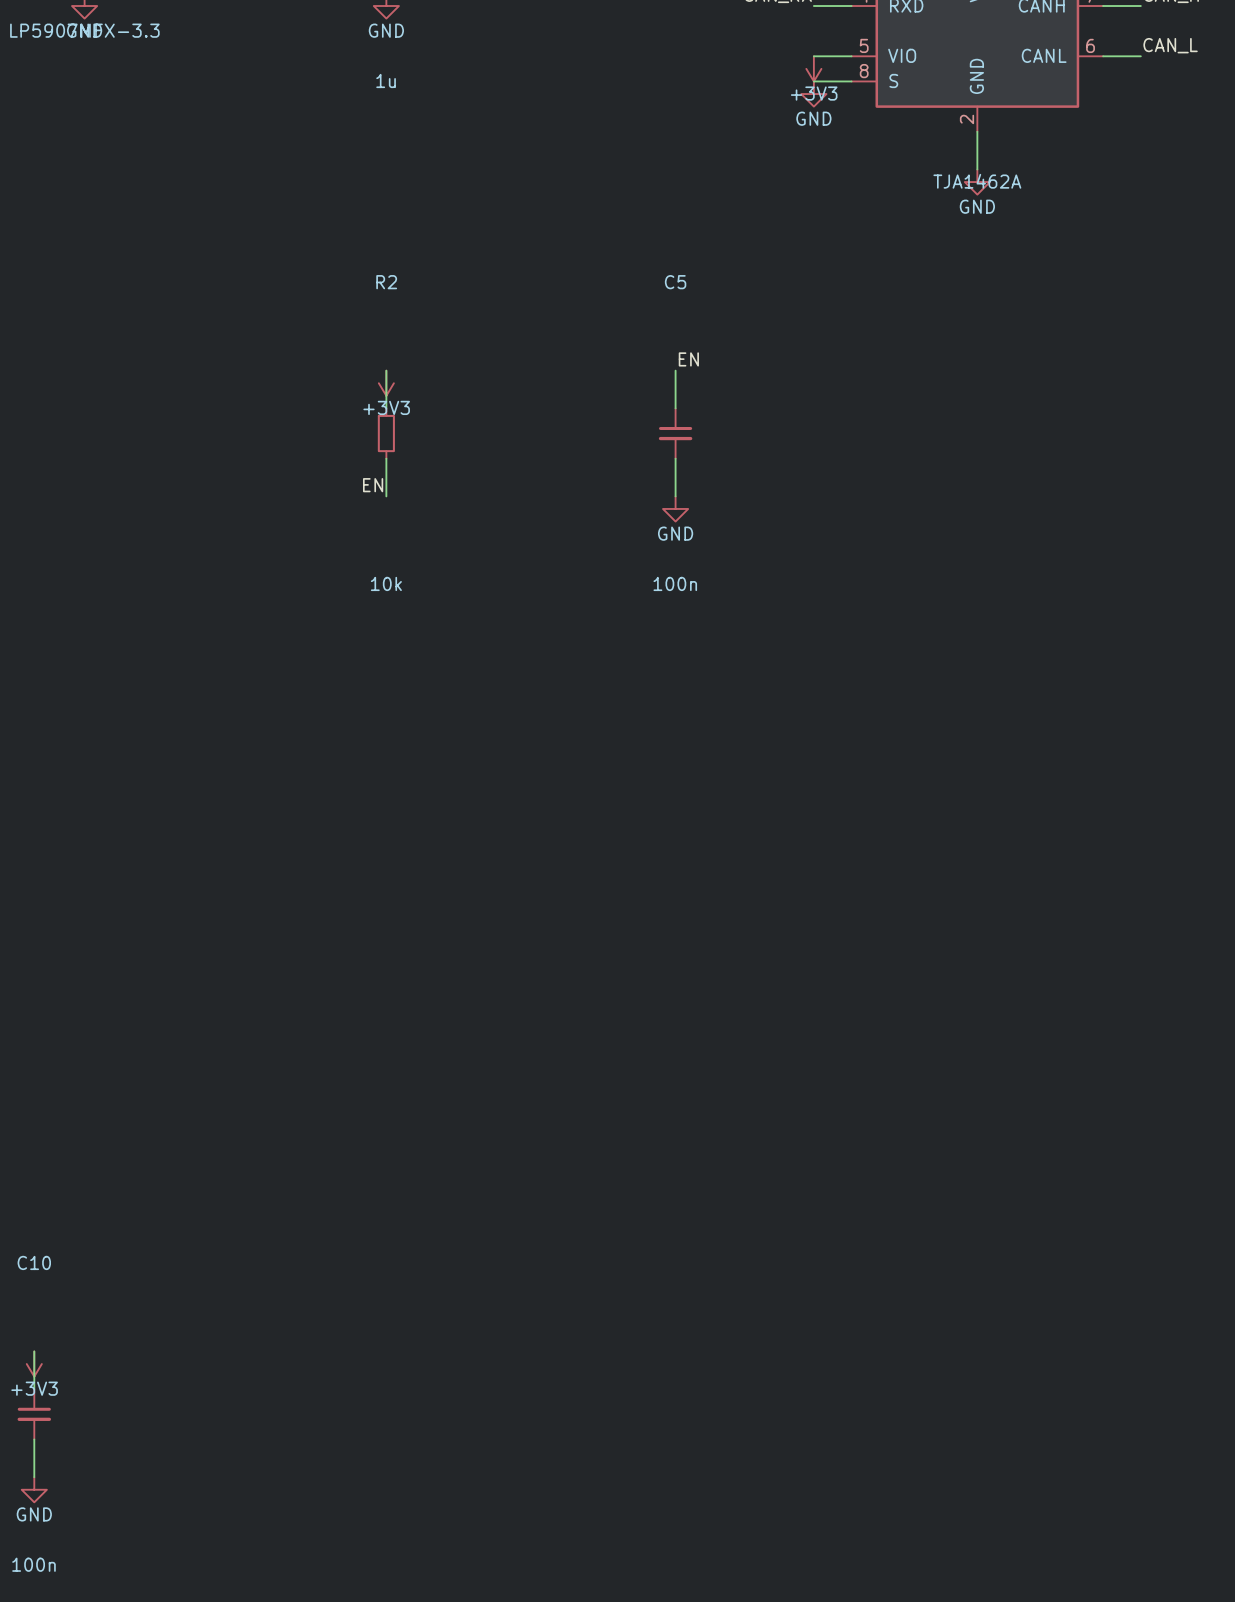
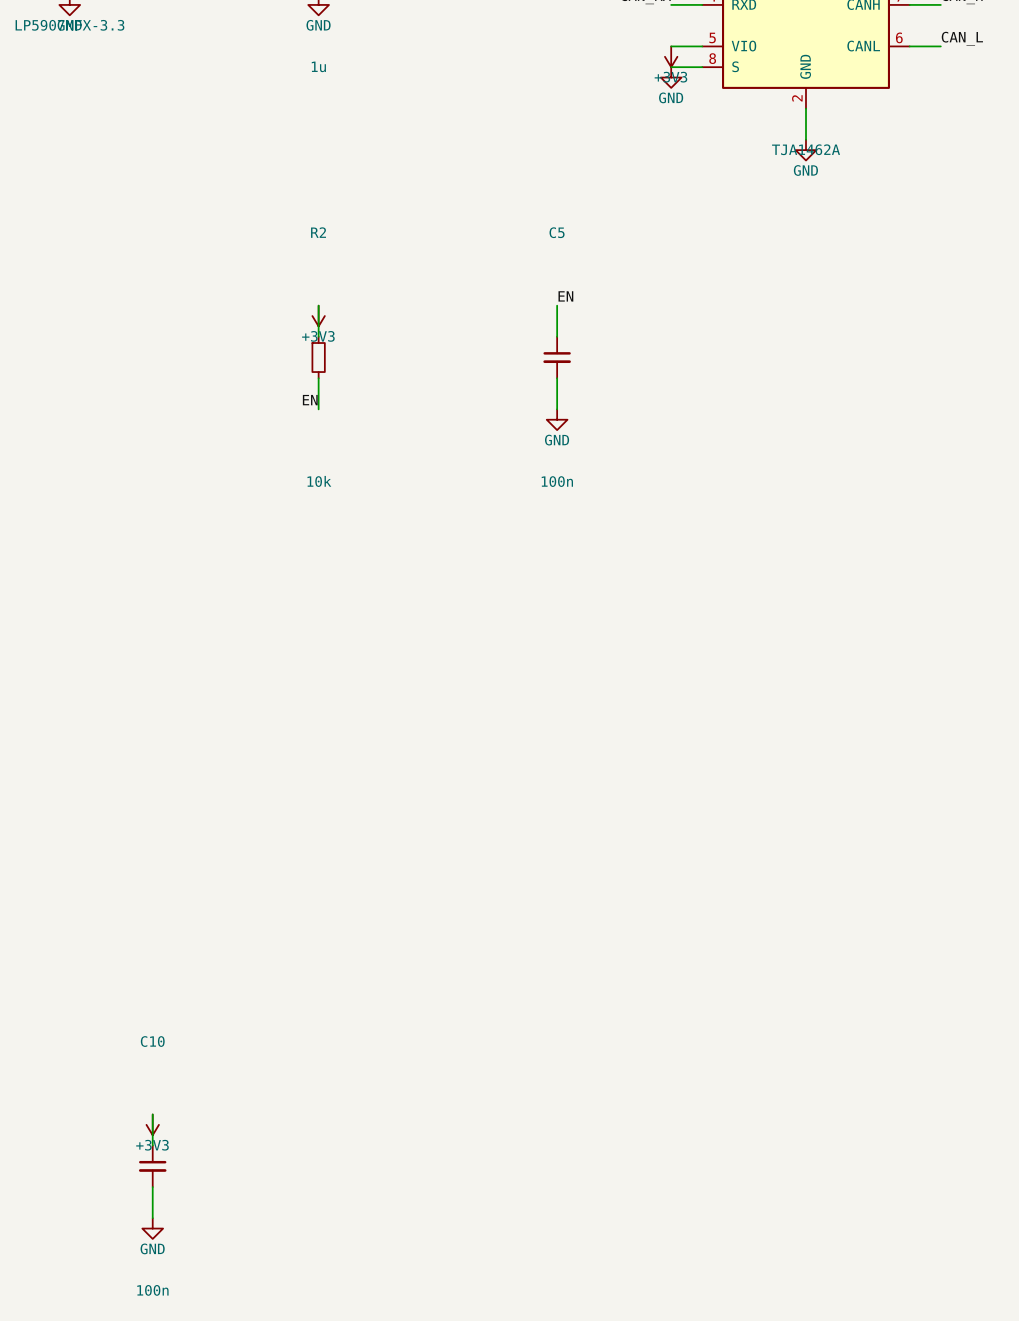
wire: (34, 1351) (34, 1389) -> (152, 1114) (152, 1145)
power symbol position: +3V3 (34, 1364) -> +3V3 (152, 1124)
C10 position: (34, 1414) -> (152, 1166)
wire: (34, 1439) (34, 1477) -> (152, 1187) (152, 1218)
power symbol: GND (34, 1489) -> none
power symbol: none -> GND (152, 1228)

